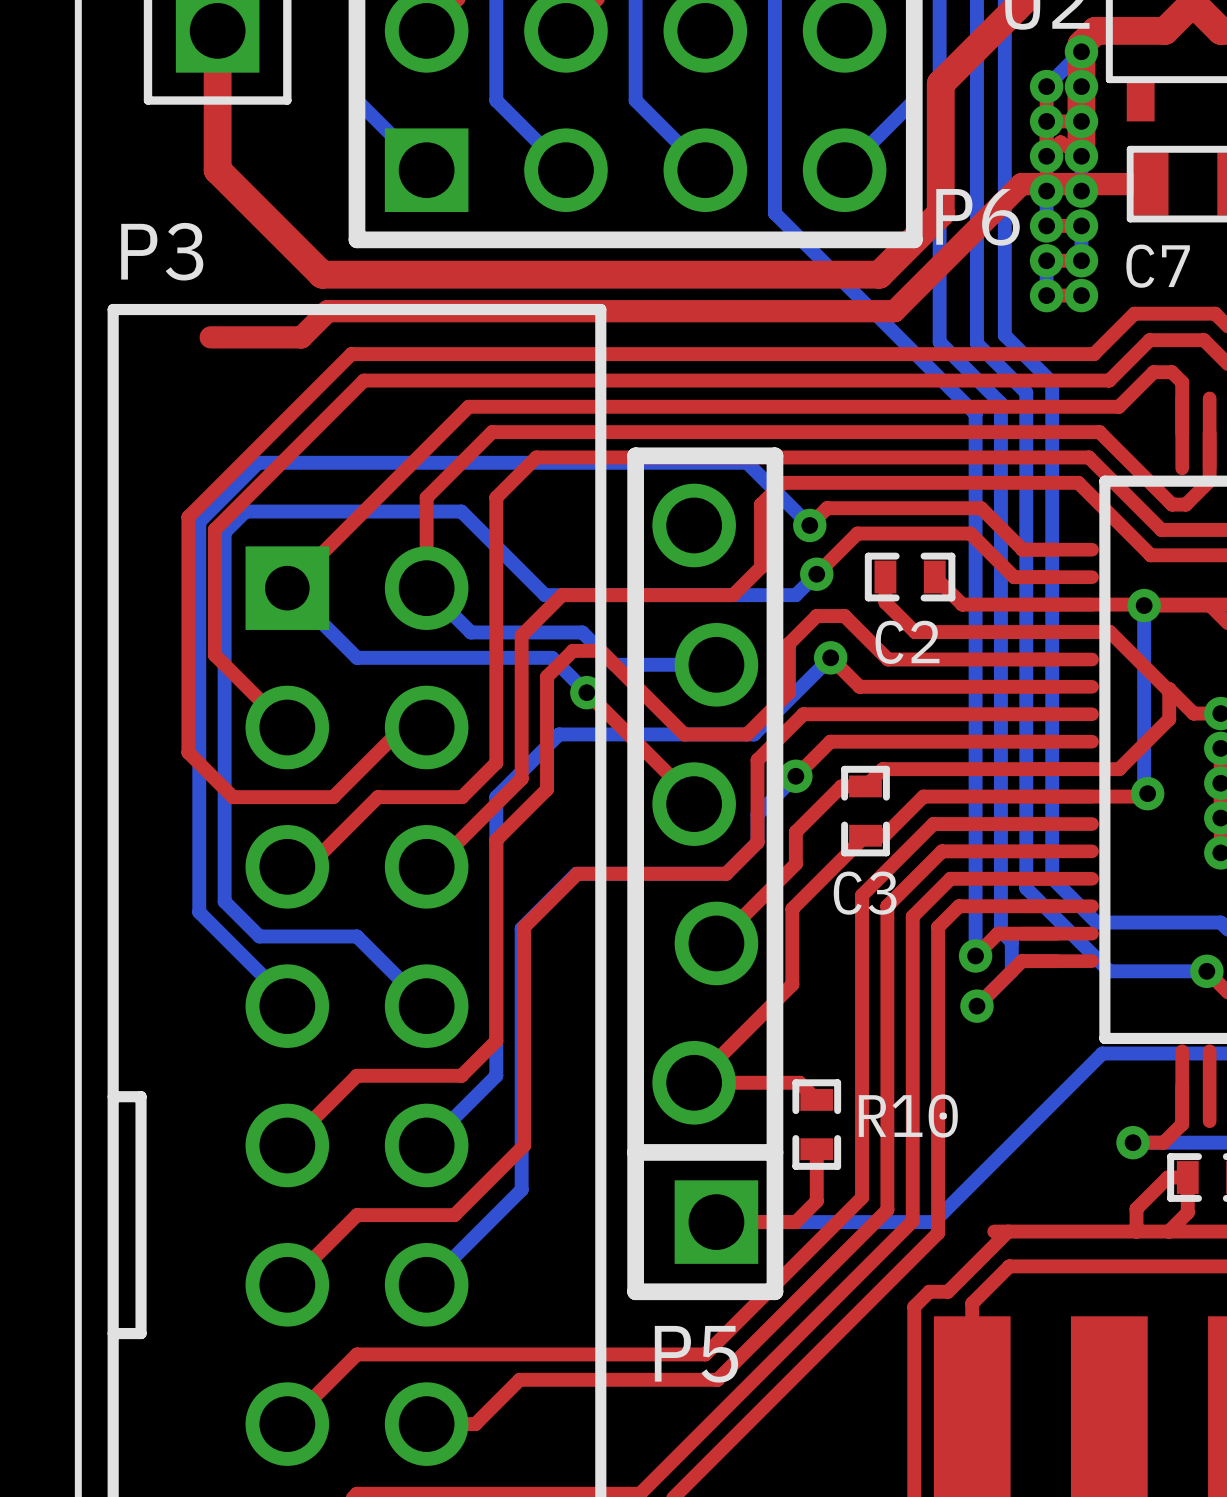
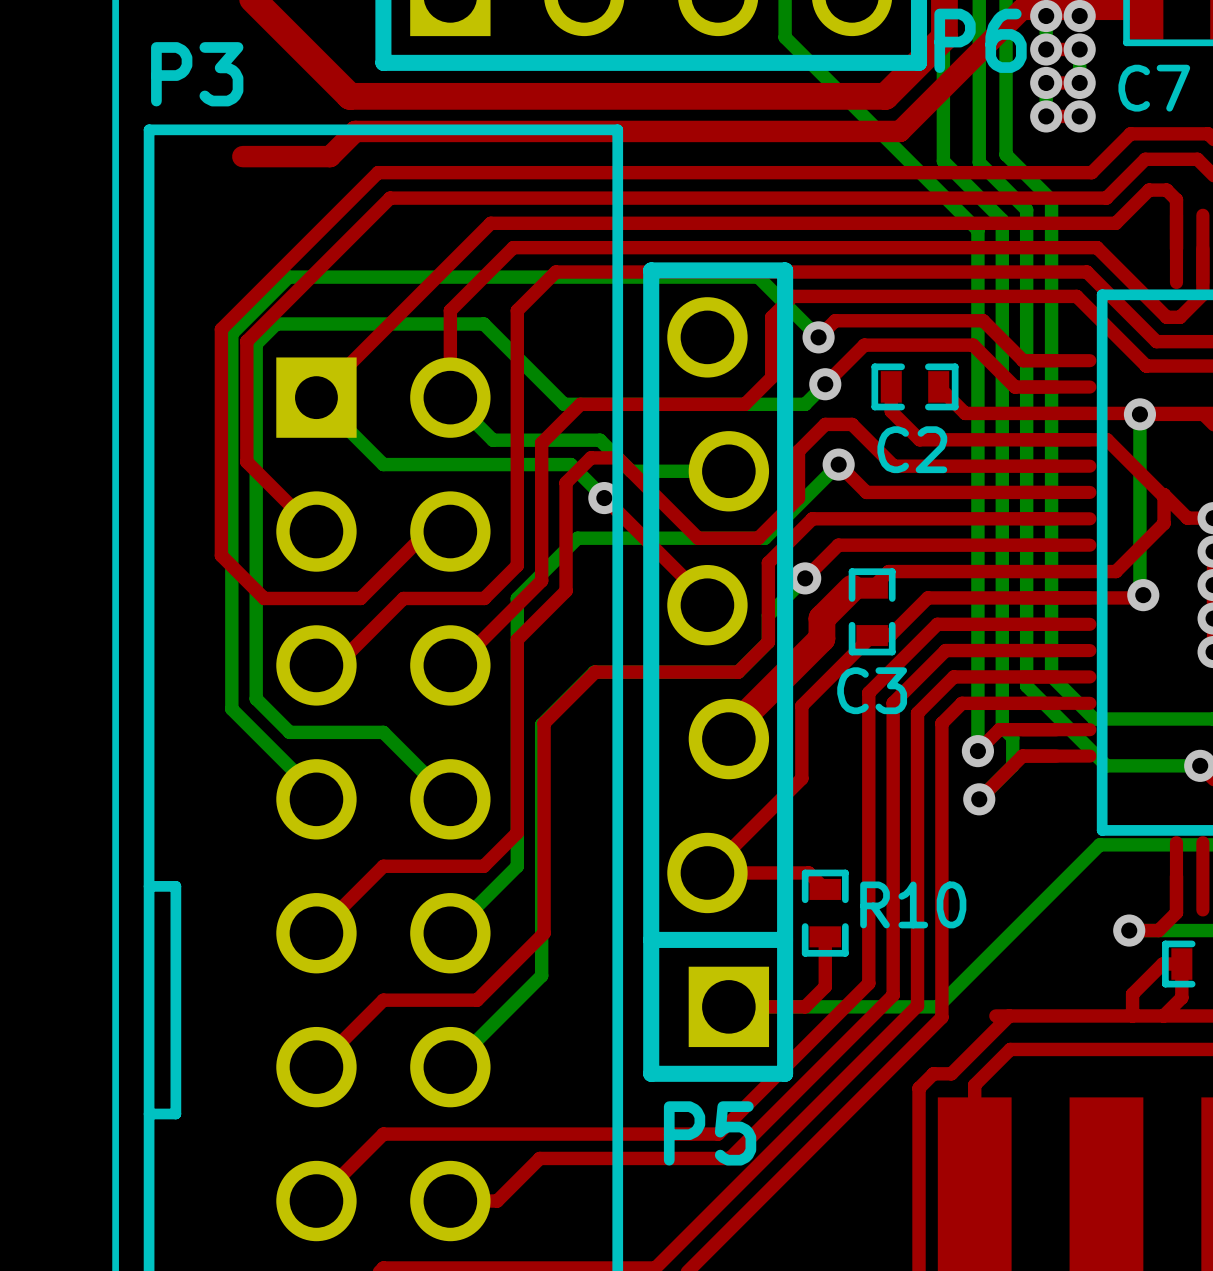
top track: (844, 786) (841, 786) (795, 831) (795, 864) (716, 943) -> (852, 588) (821, 618) (821, 638) (728, 731) (728, 739)

